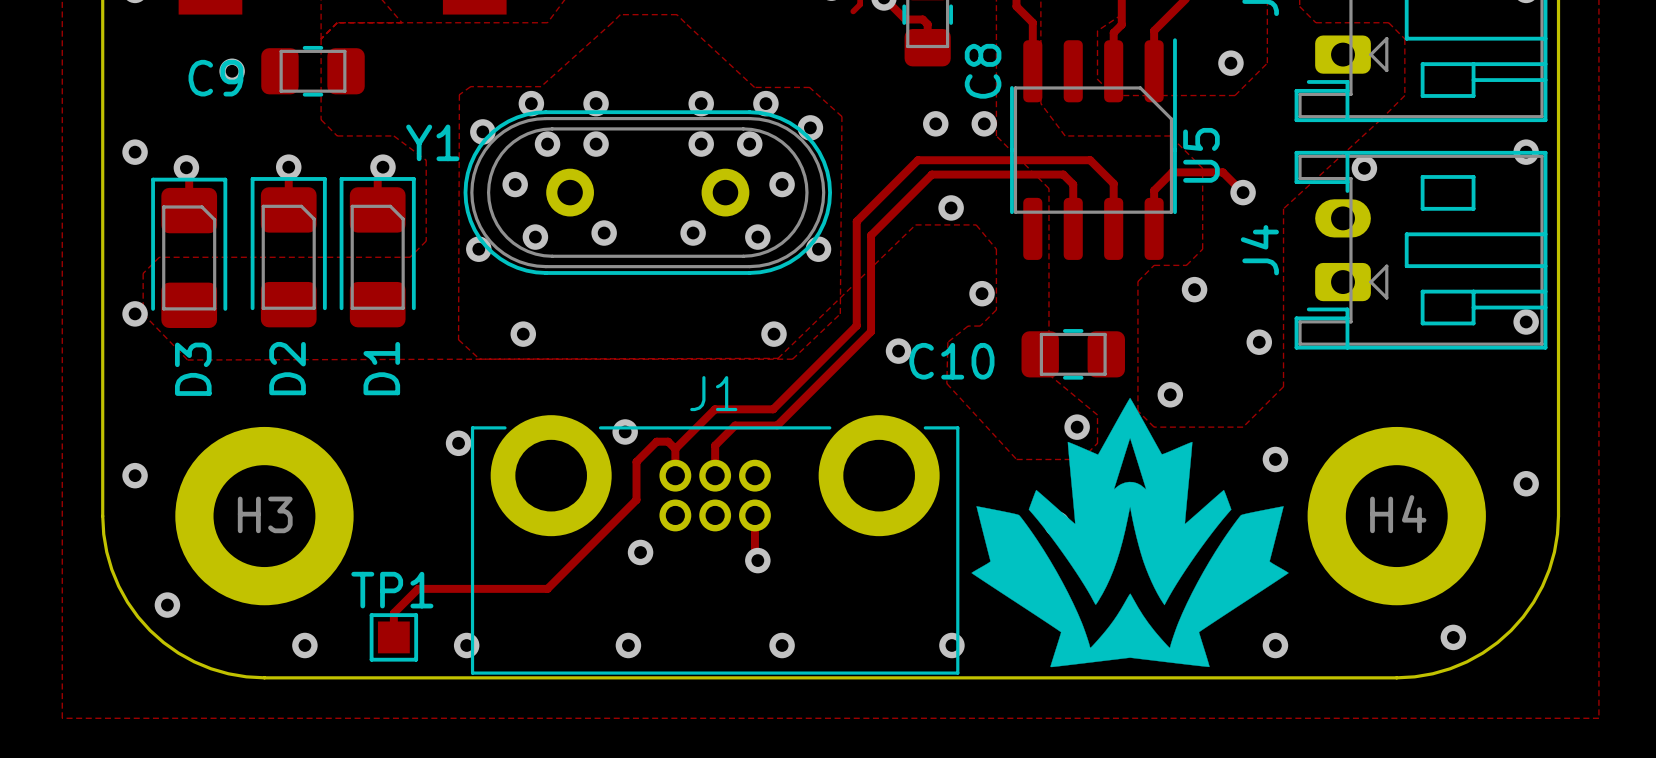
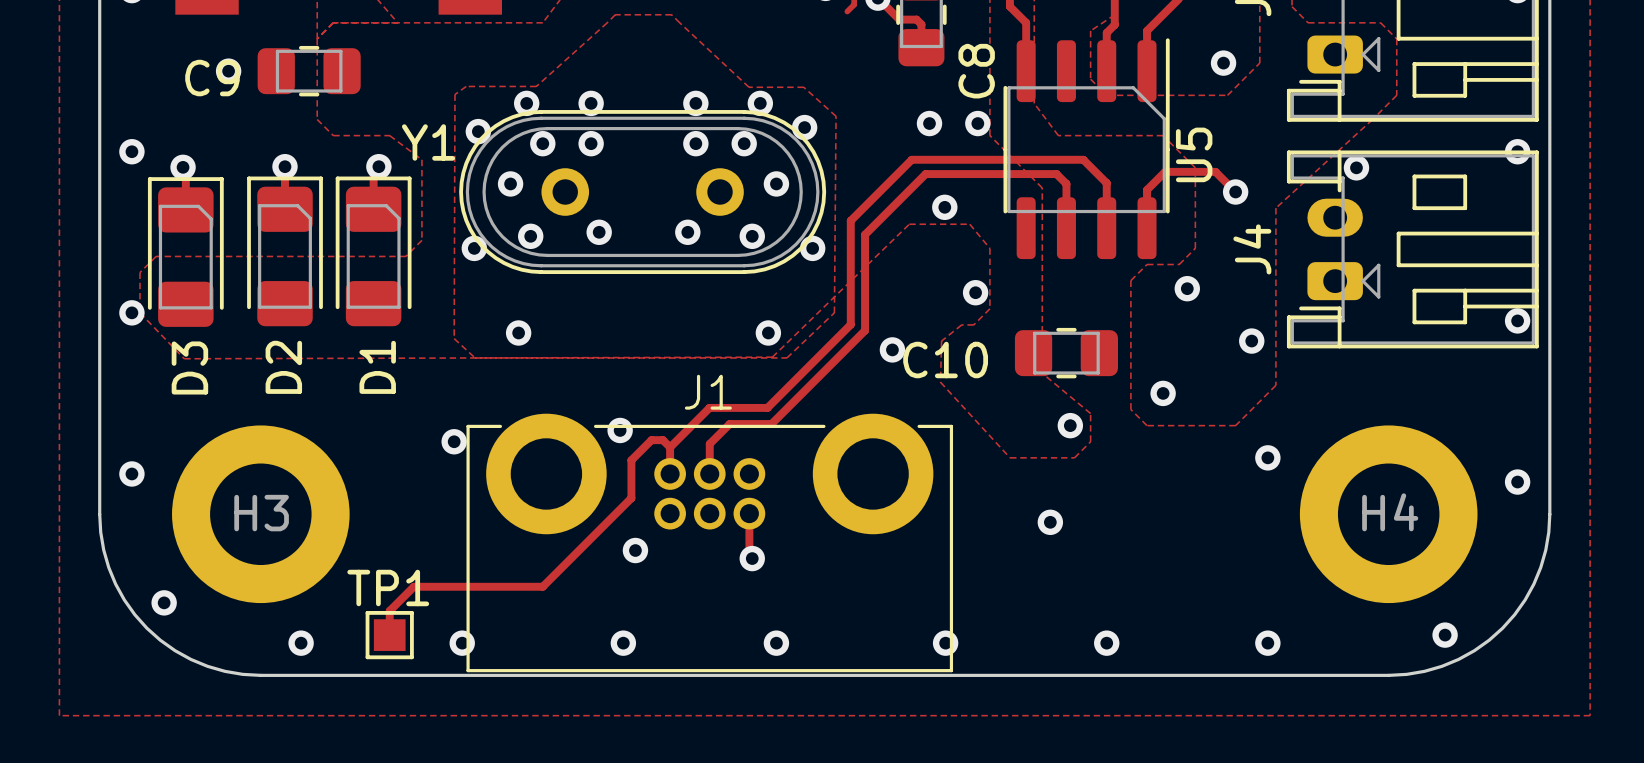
drawing: [971, 397, 1289, 668] -> none

